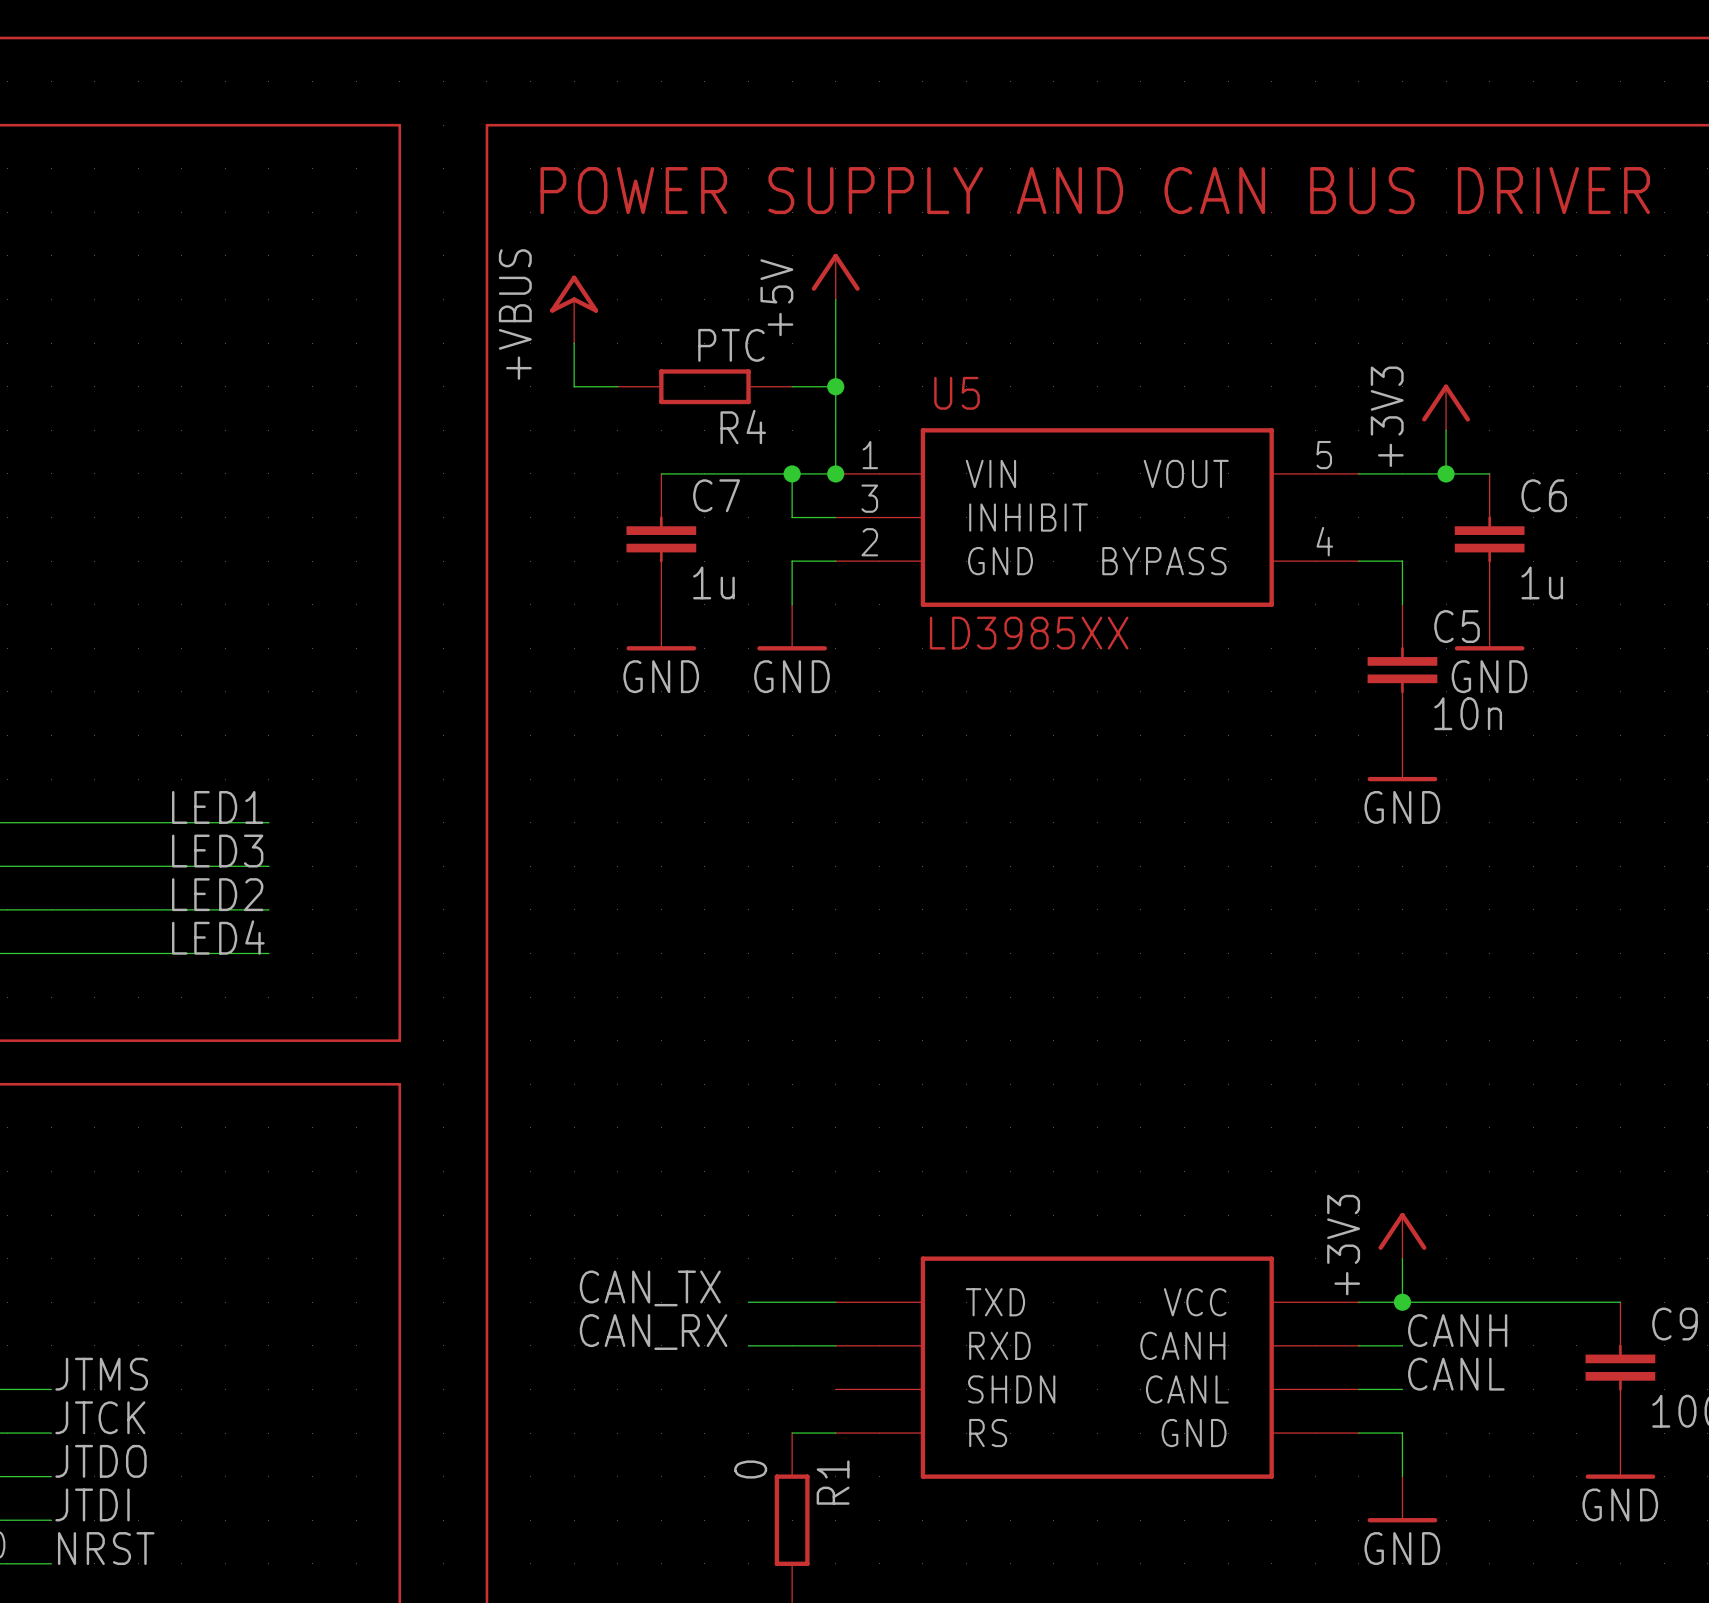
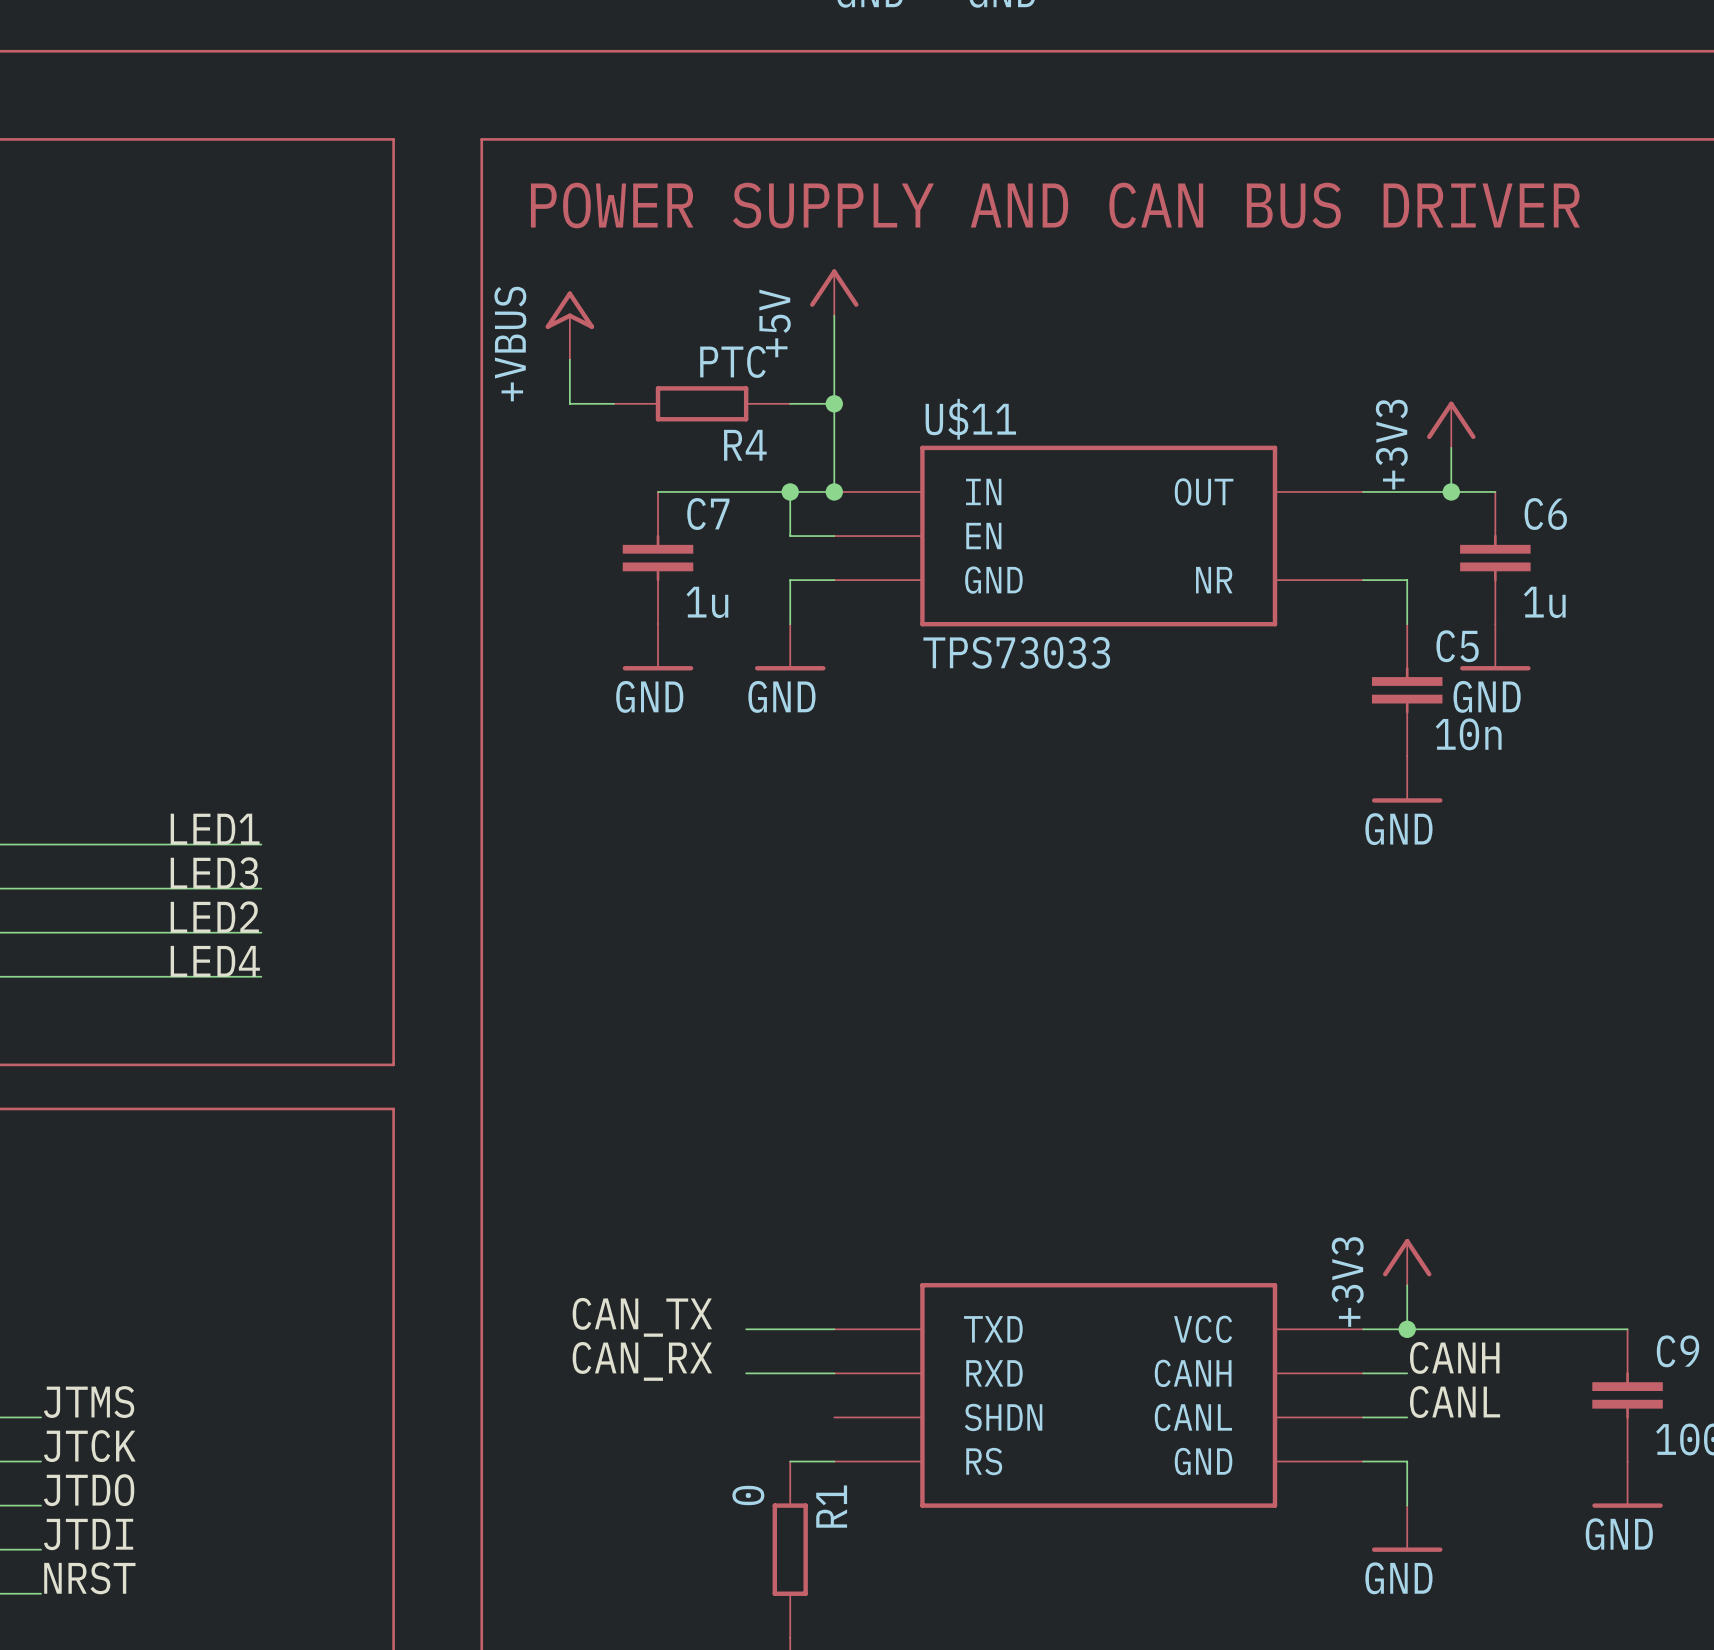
U5 name: U5 (957, 393) -> U$11 (970, 419)
U5 symbol: [835, 428, 1359, 607] -> [834, 445, 1364, 627]
U5 value: LD3985XX (1029, 633) -> TPS73033 (1016, 652)

